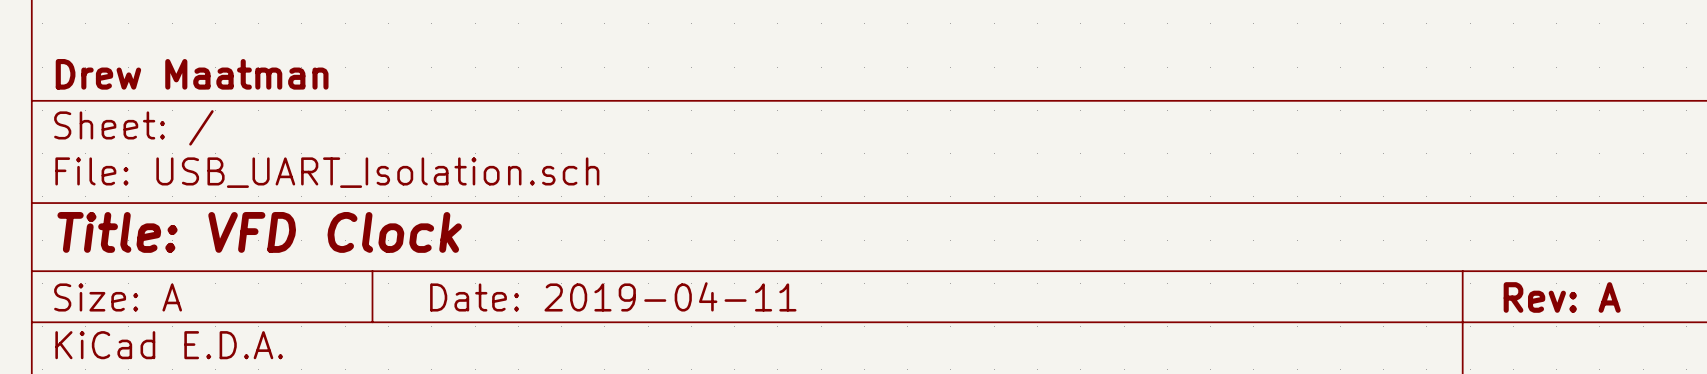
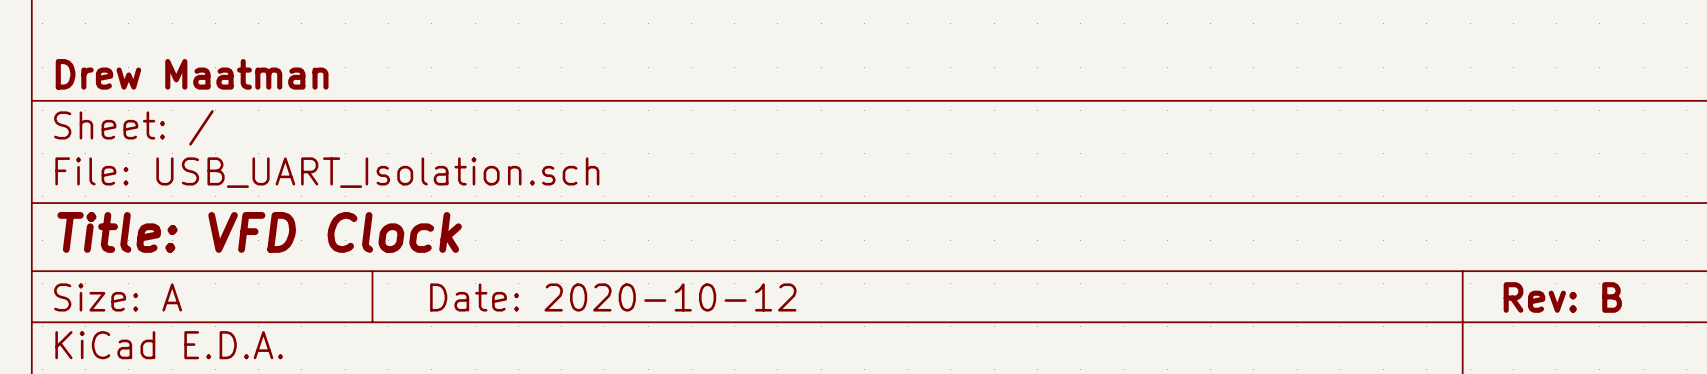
title block: Date: 2019-04-11 (613, 296) -> Date: 2020-10-12 (613, 297)
title block: Rev: A (1562, 297) -> Rev: B (1562, 297)

